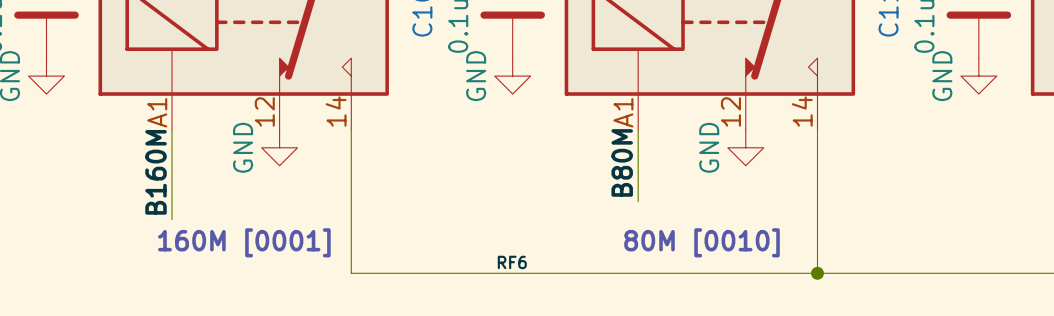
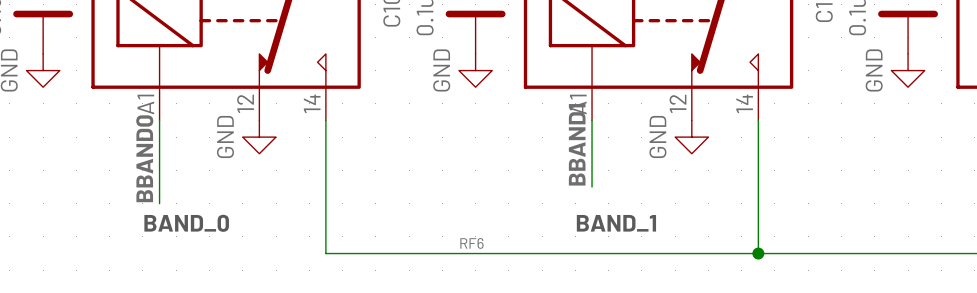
label: B80M (622, 162) -> BBAND1 (577, 144)
label: B160M (156, 172) -> BBAND0 (144, 158)
text: 160M [0001] (244, 242) -> BAND_0 (186, 223)
text: 80M [0010] (702, 242) -> BAND_1 (616, 223)

